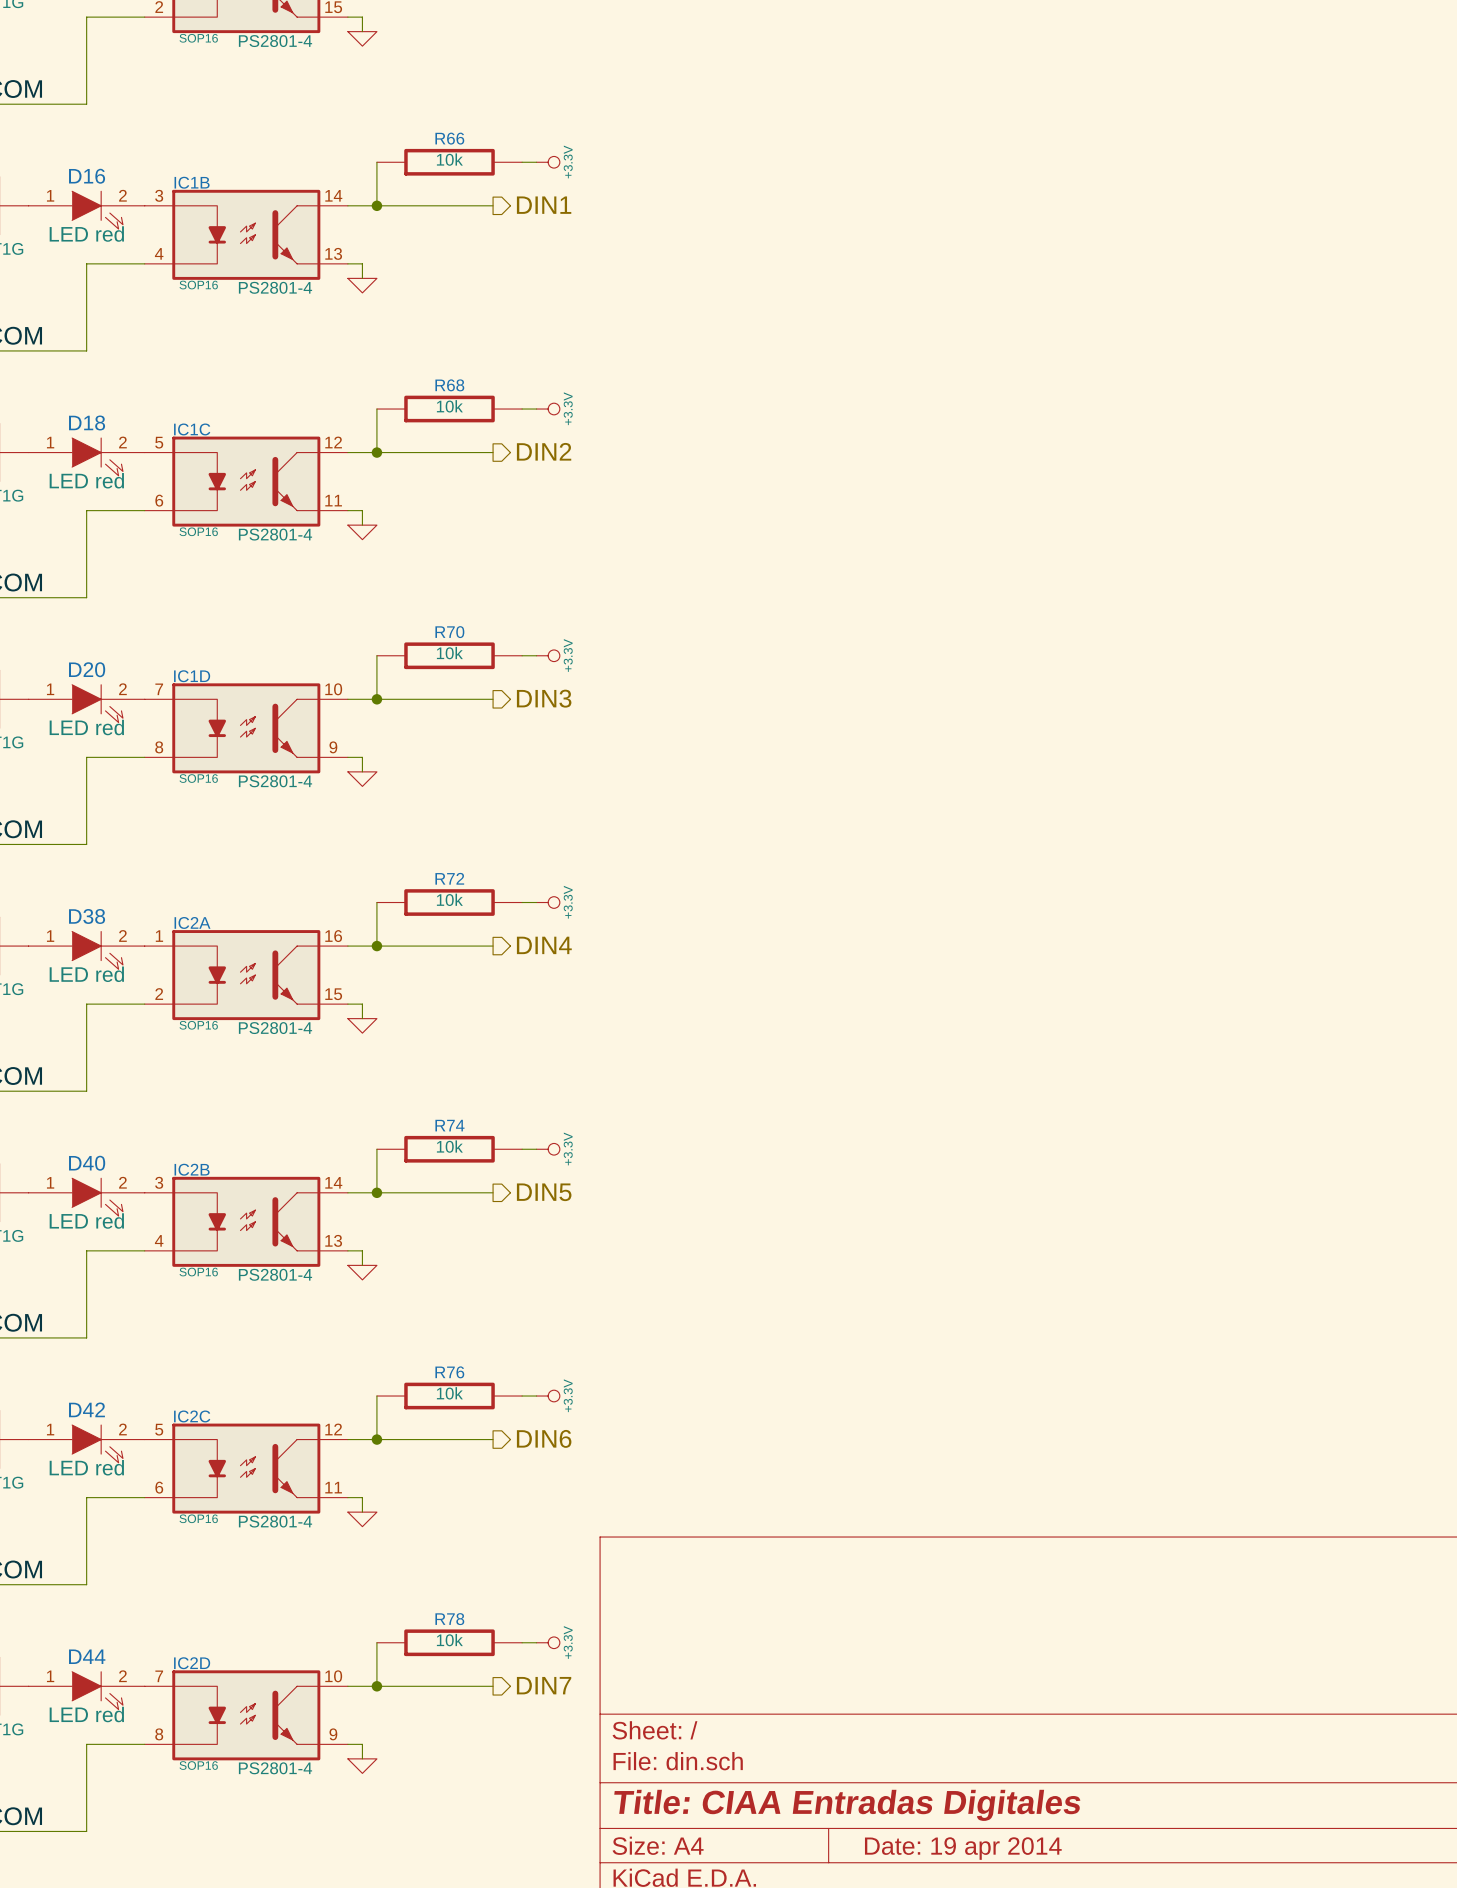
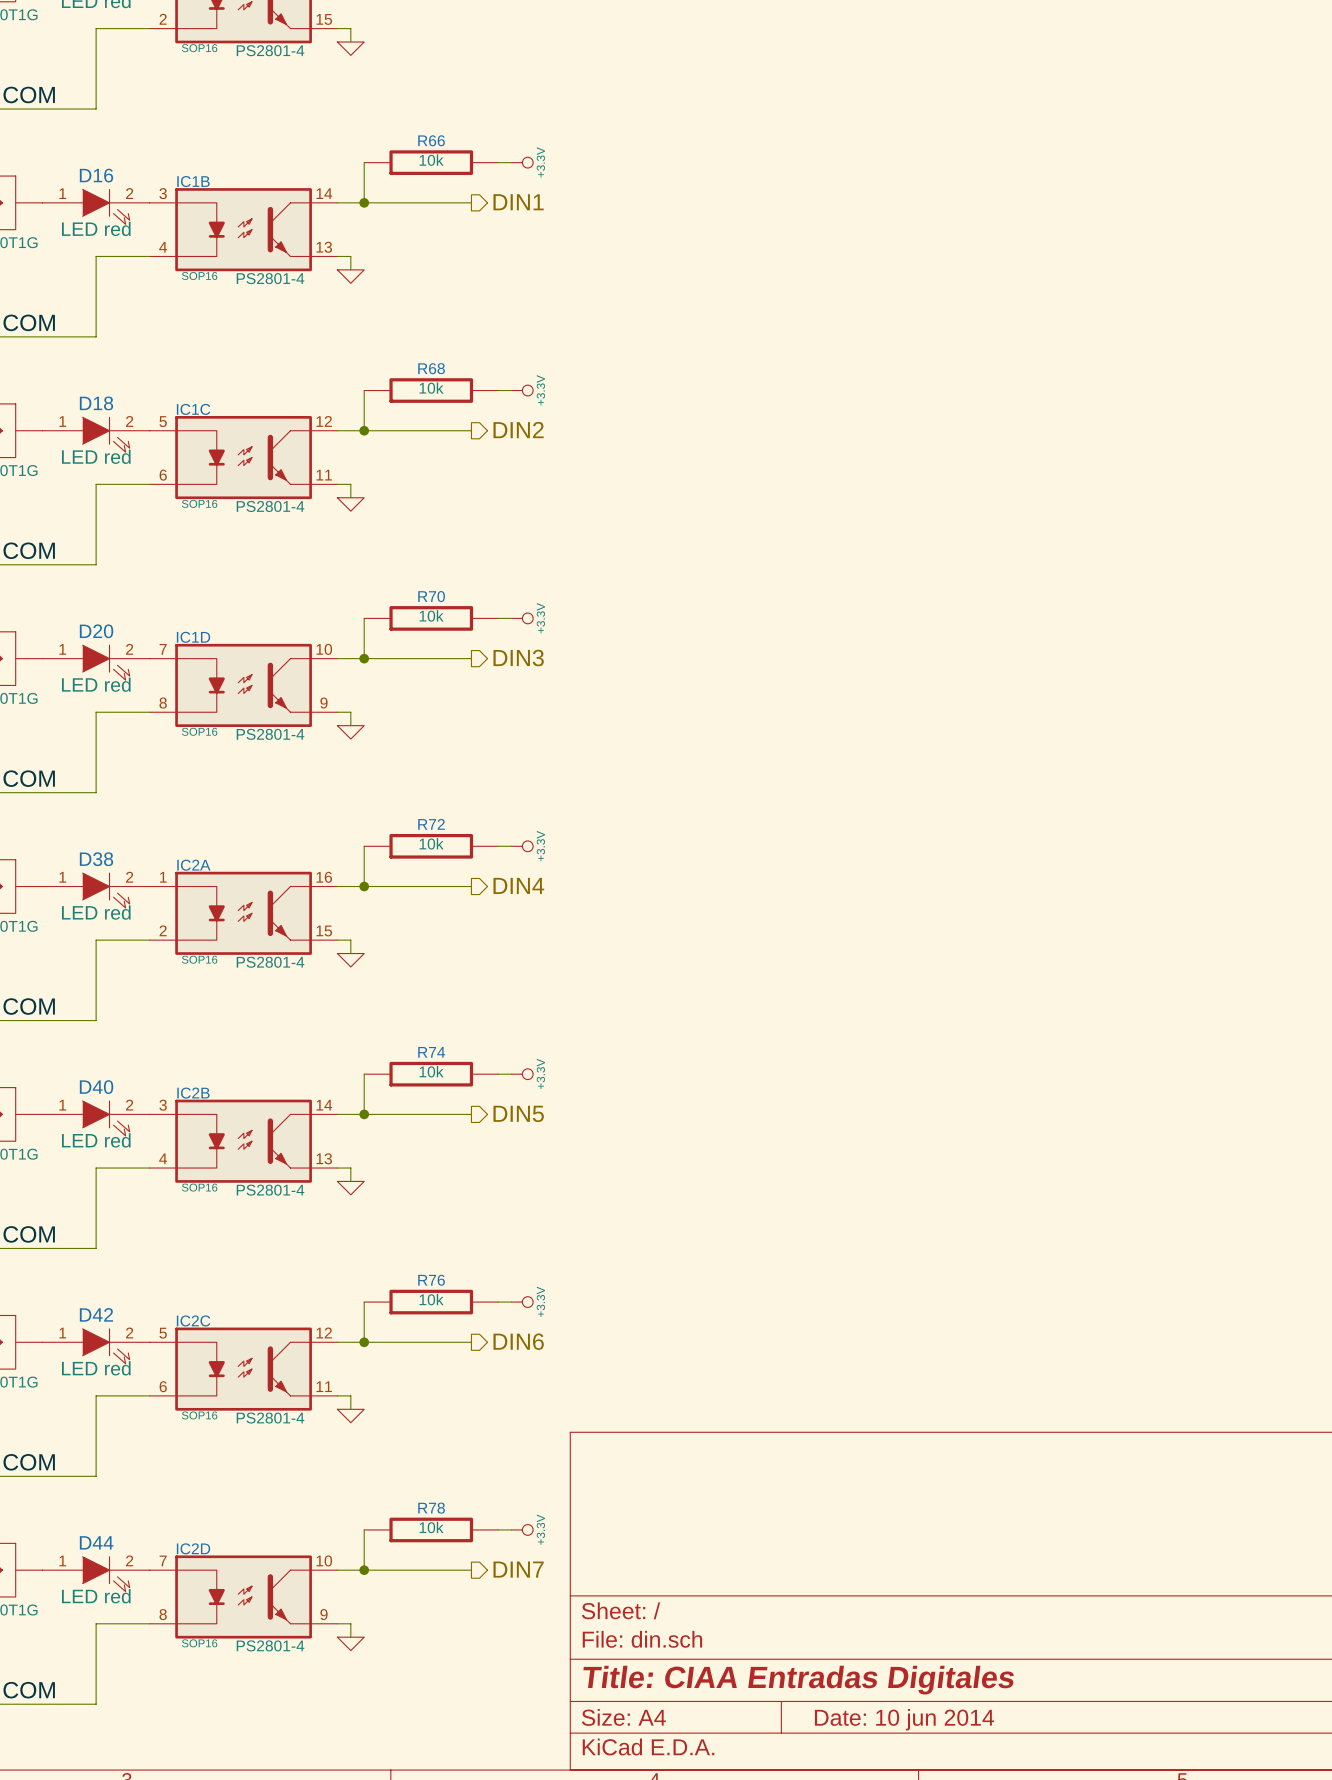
title block: Date: 19 apr 2014 (963, 1848) -> Date: 10 jun 2014 (904, 1719)

